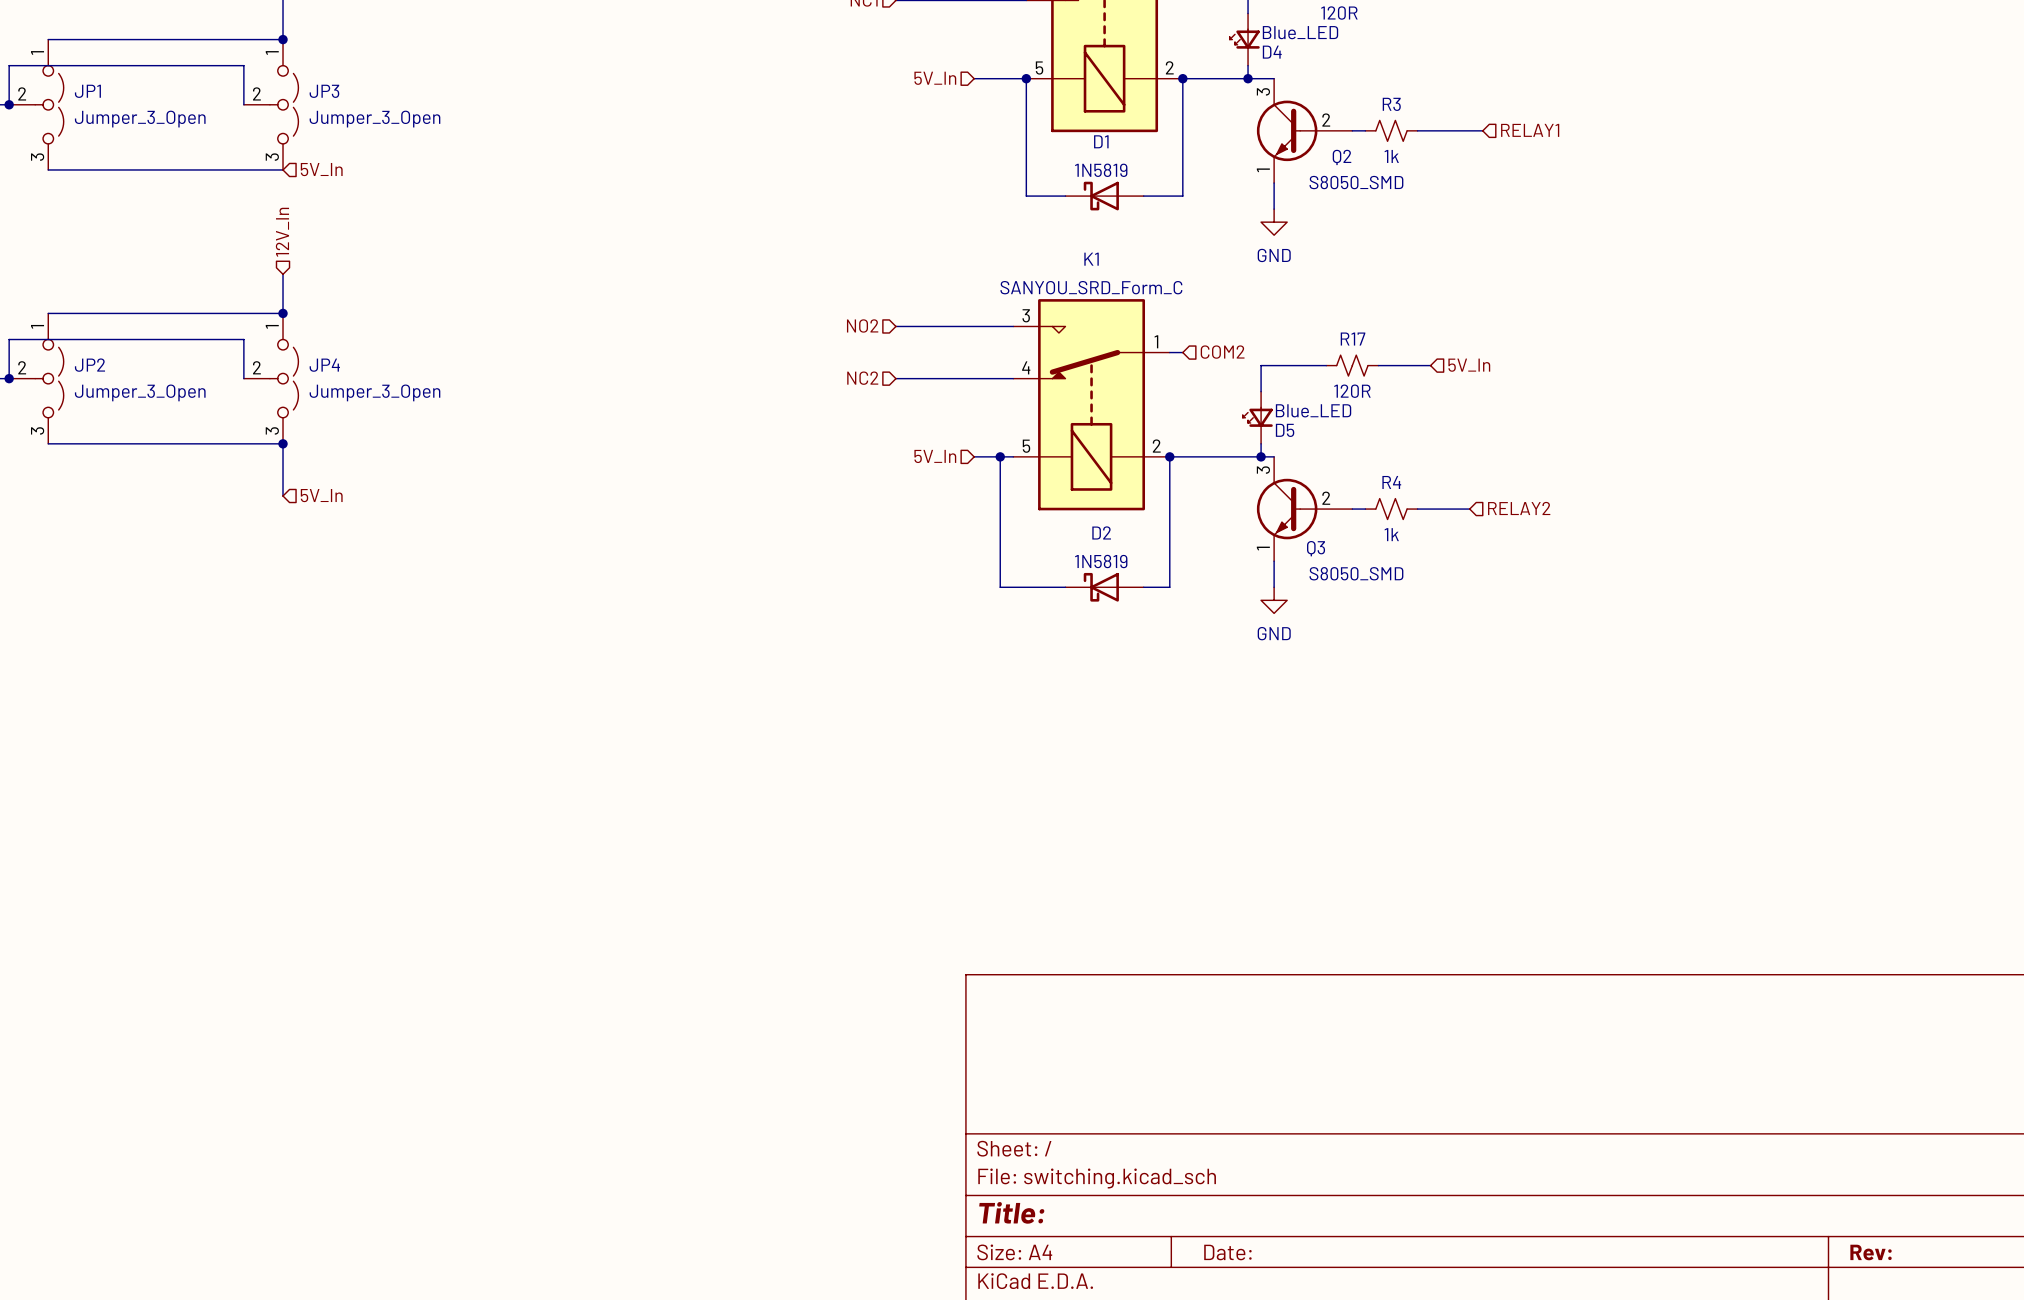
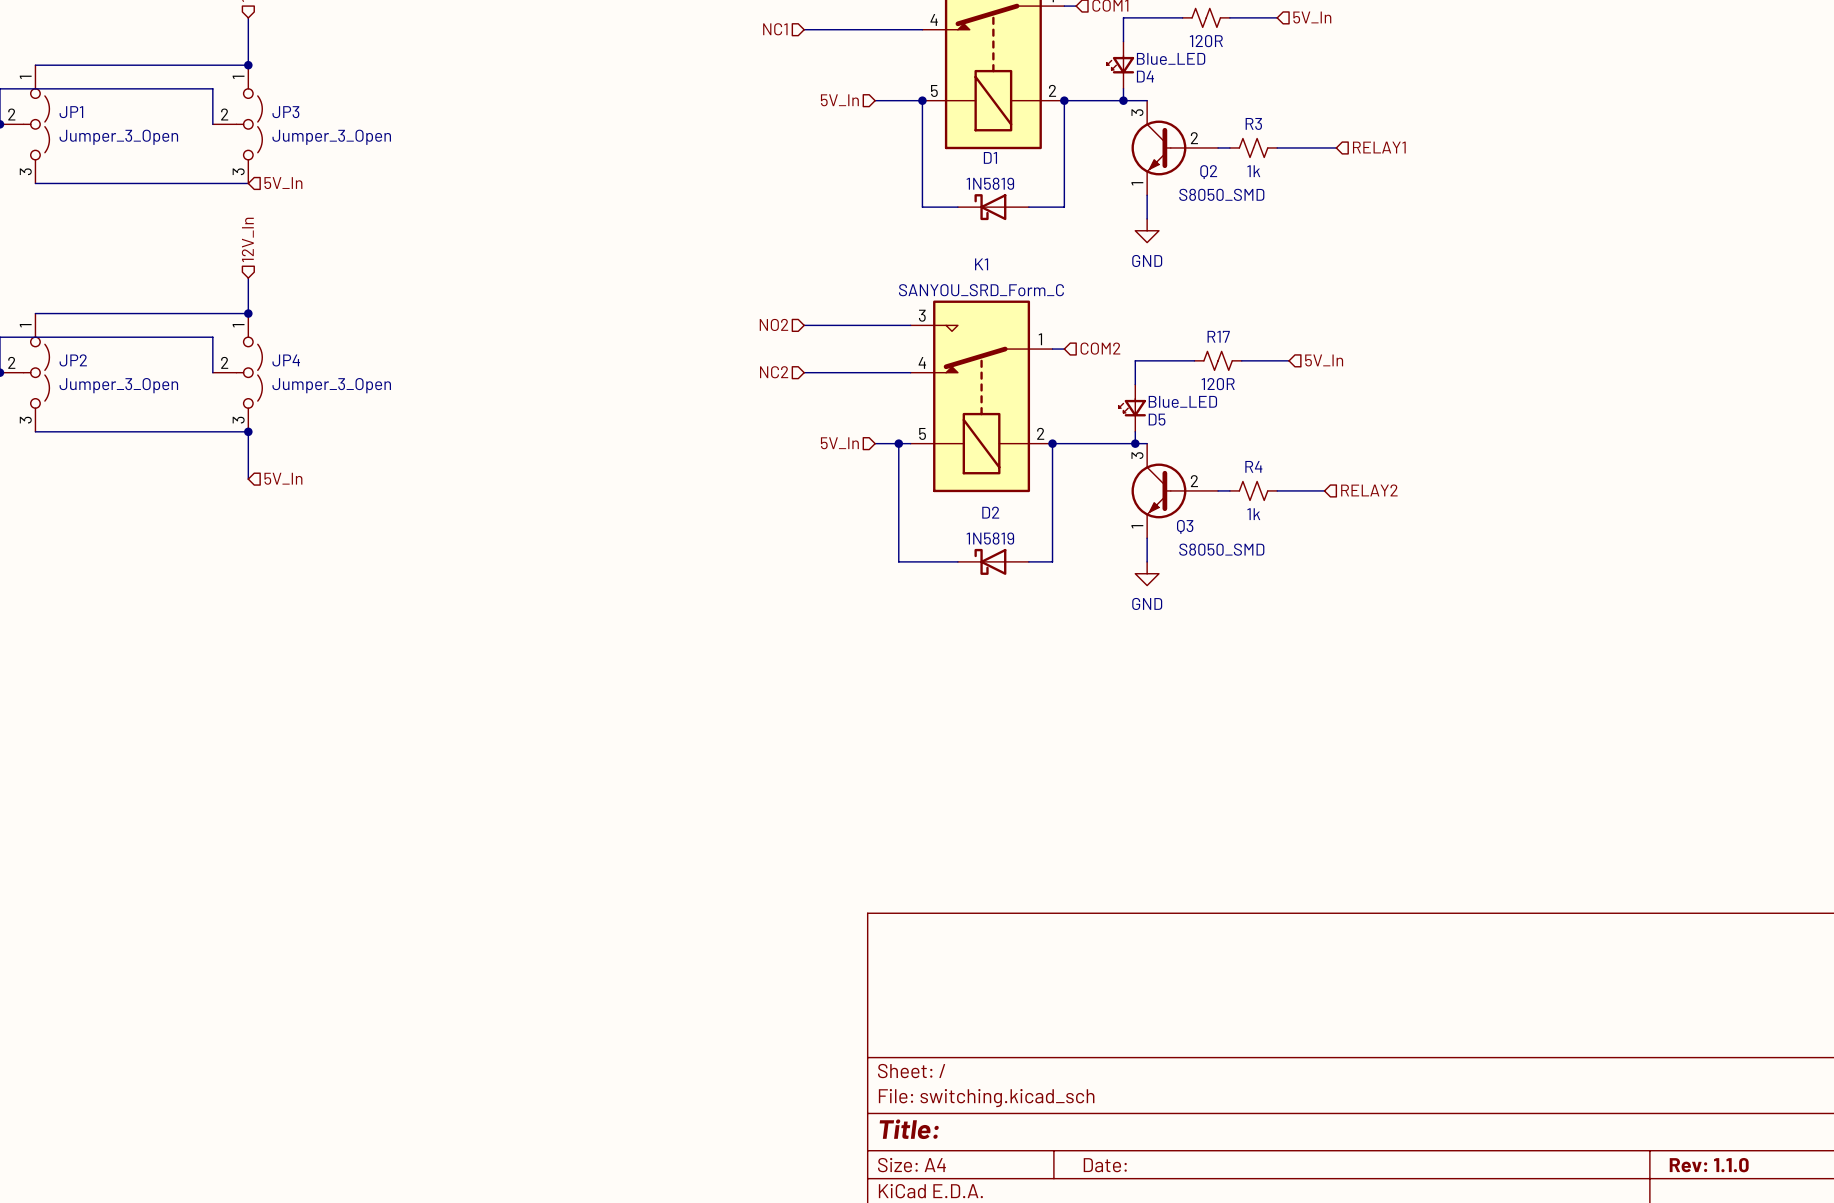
title block: Rev: (1871, 1252) -> Rev: 1.1.0 (1709, 1165)

